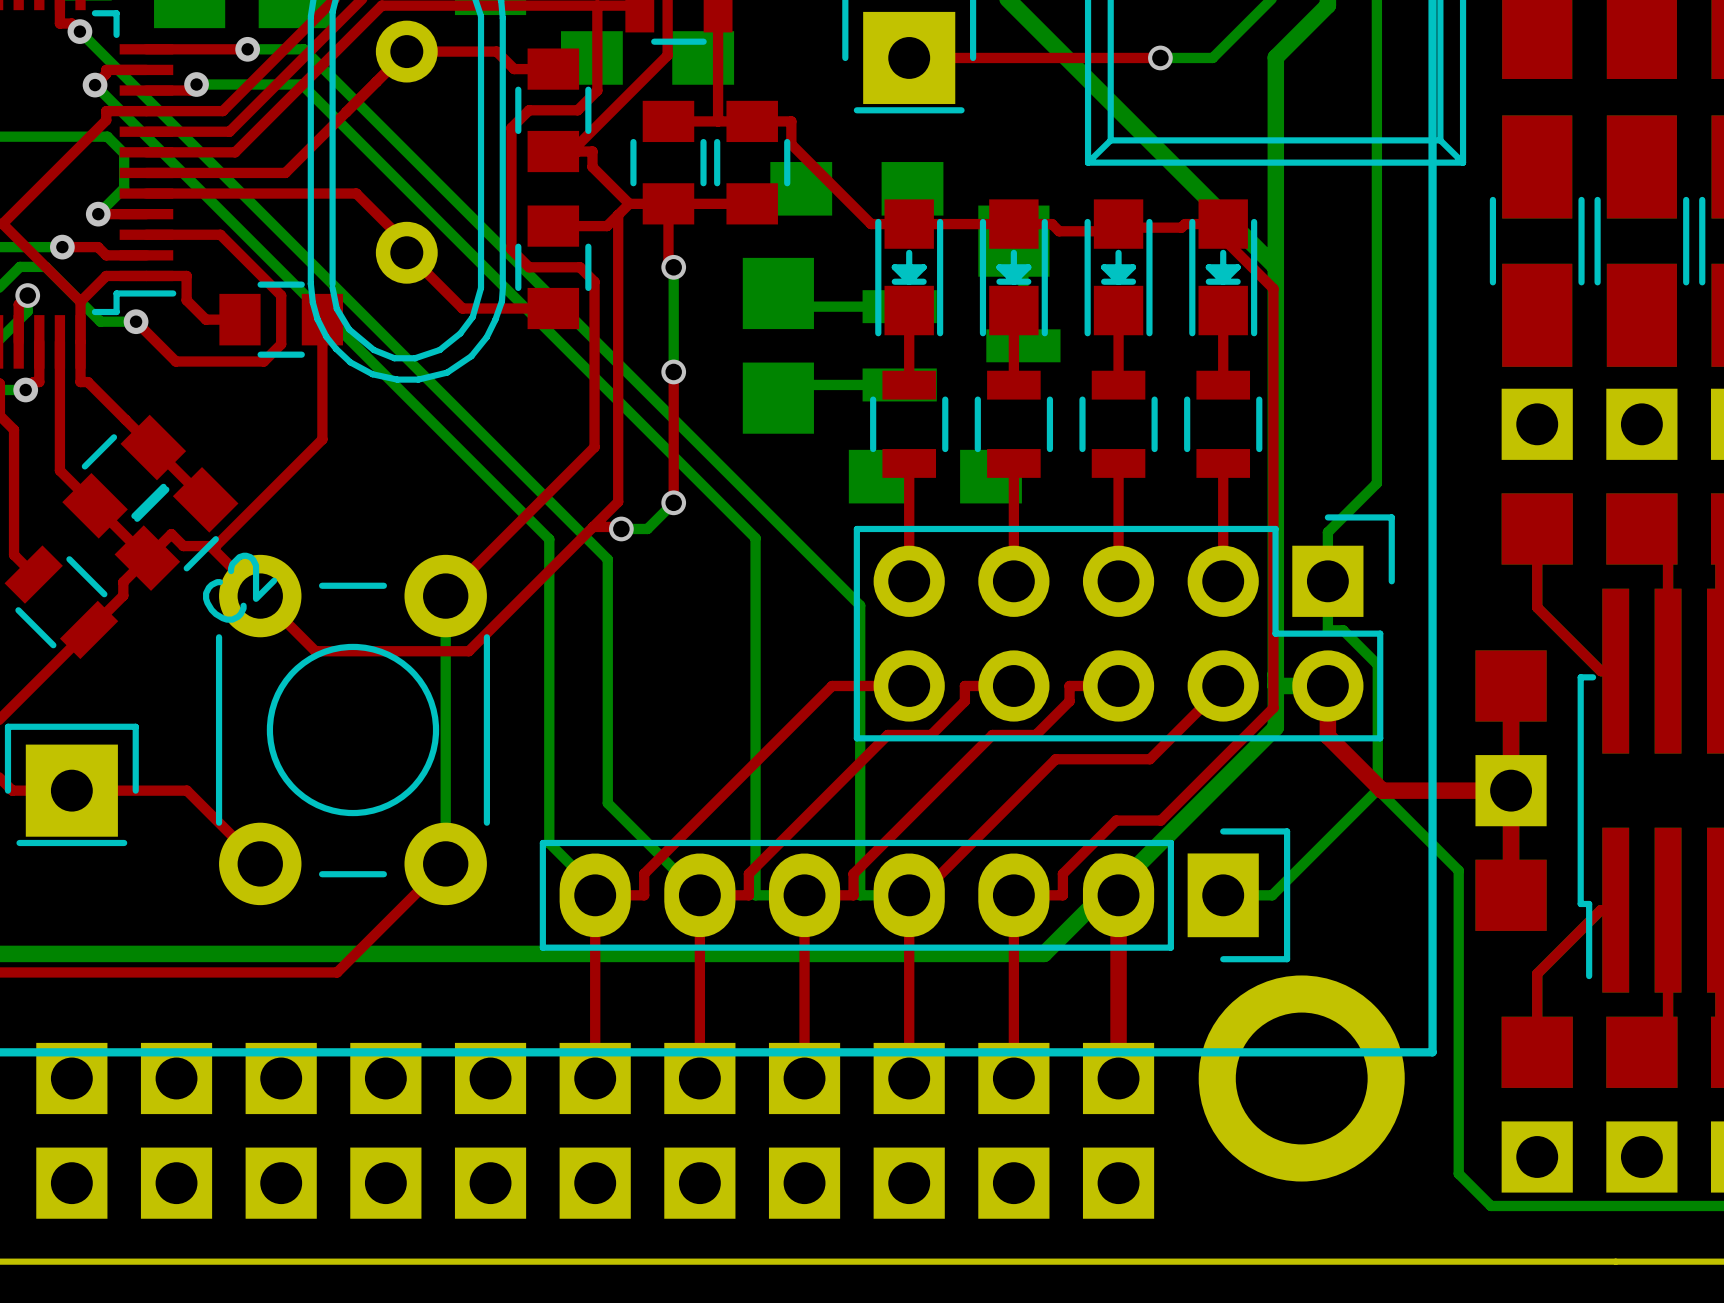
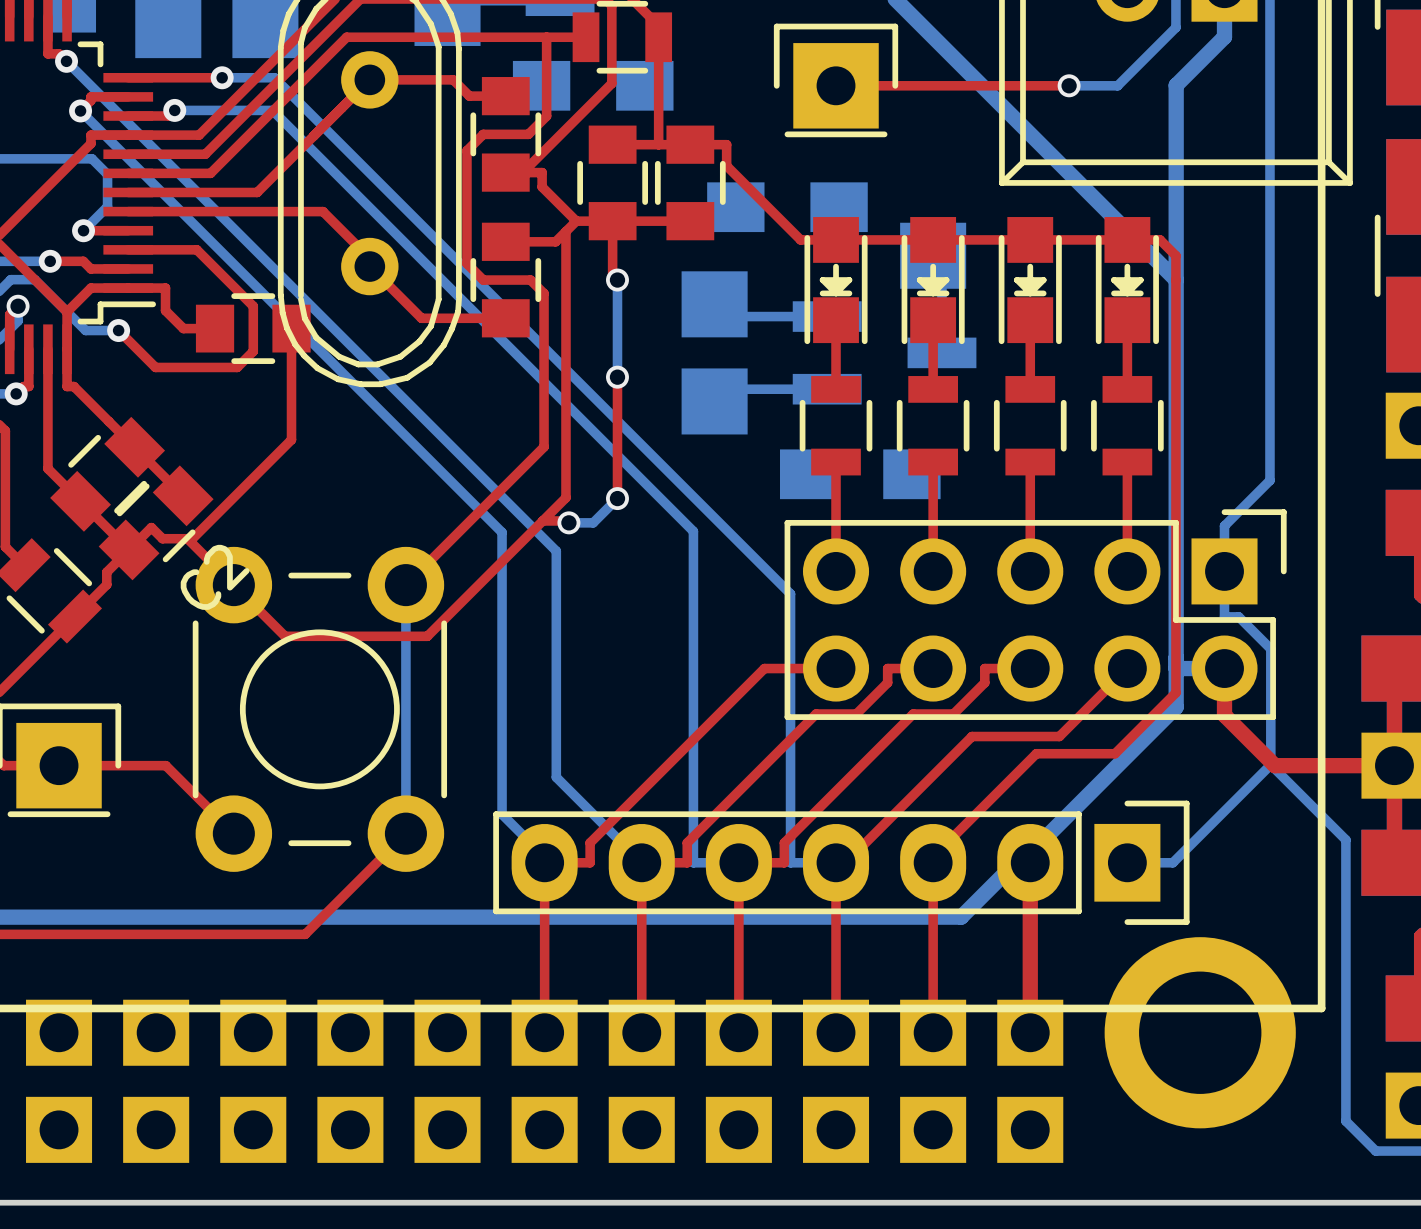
top track: (1052, 224) (1059, 231) (1118, 231) -> none
top track: (1185, 224) (1181, 227) (1118, 227) -> (1092, 239) (968, 239)
top track: (1208, 224) (1273, 288) (1273, 708) (1160, 820) (1116, 820) (1062, 873) (1062, 895) (1013, 895) -> (1127, 239) (1160, 239) (1175, 255) (1175, 692) (1115, 753) (1036, 753) (933, 856) (933, 862)

